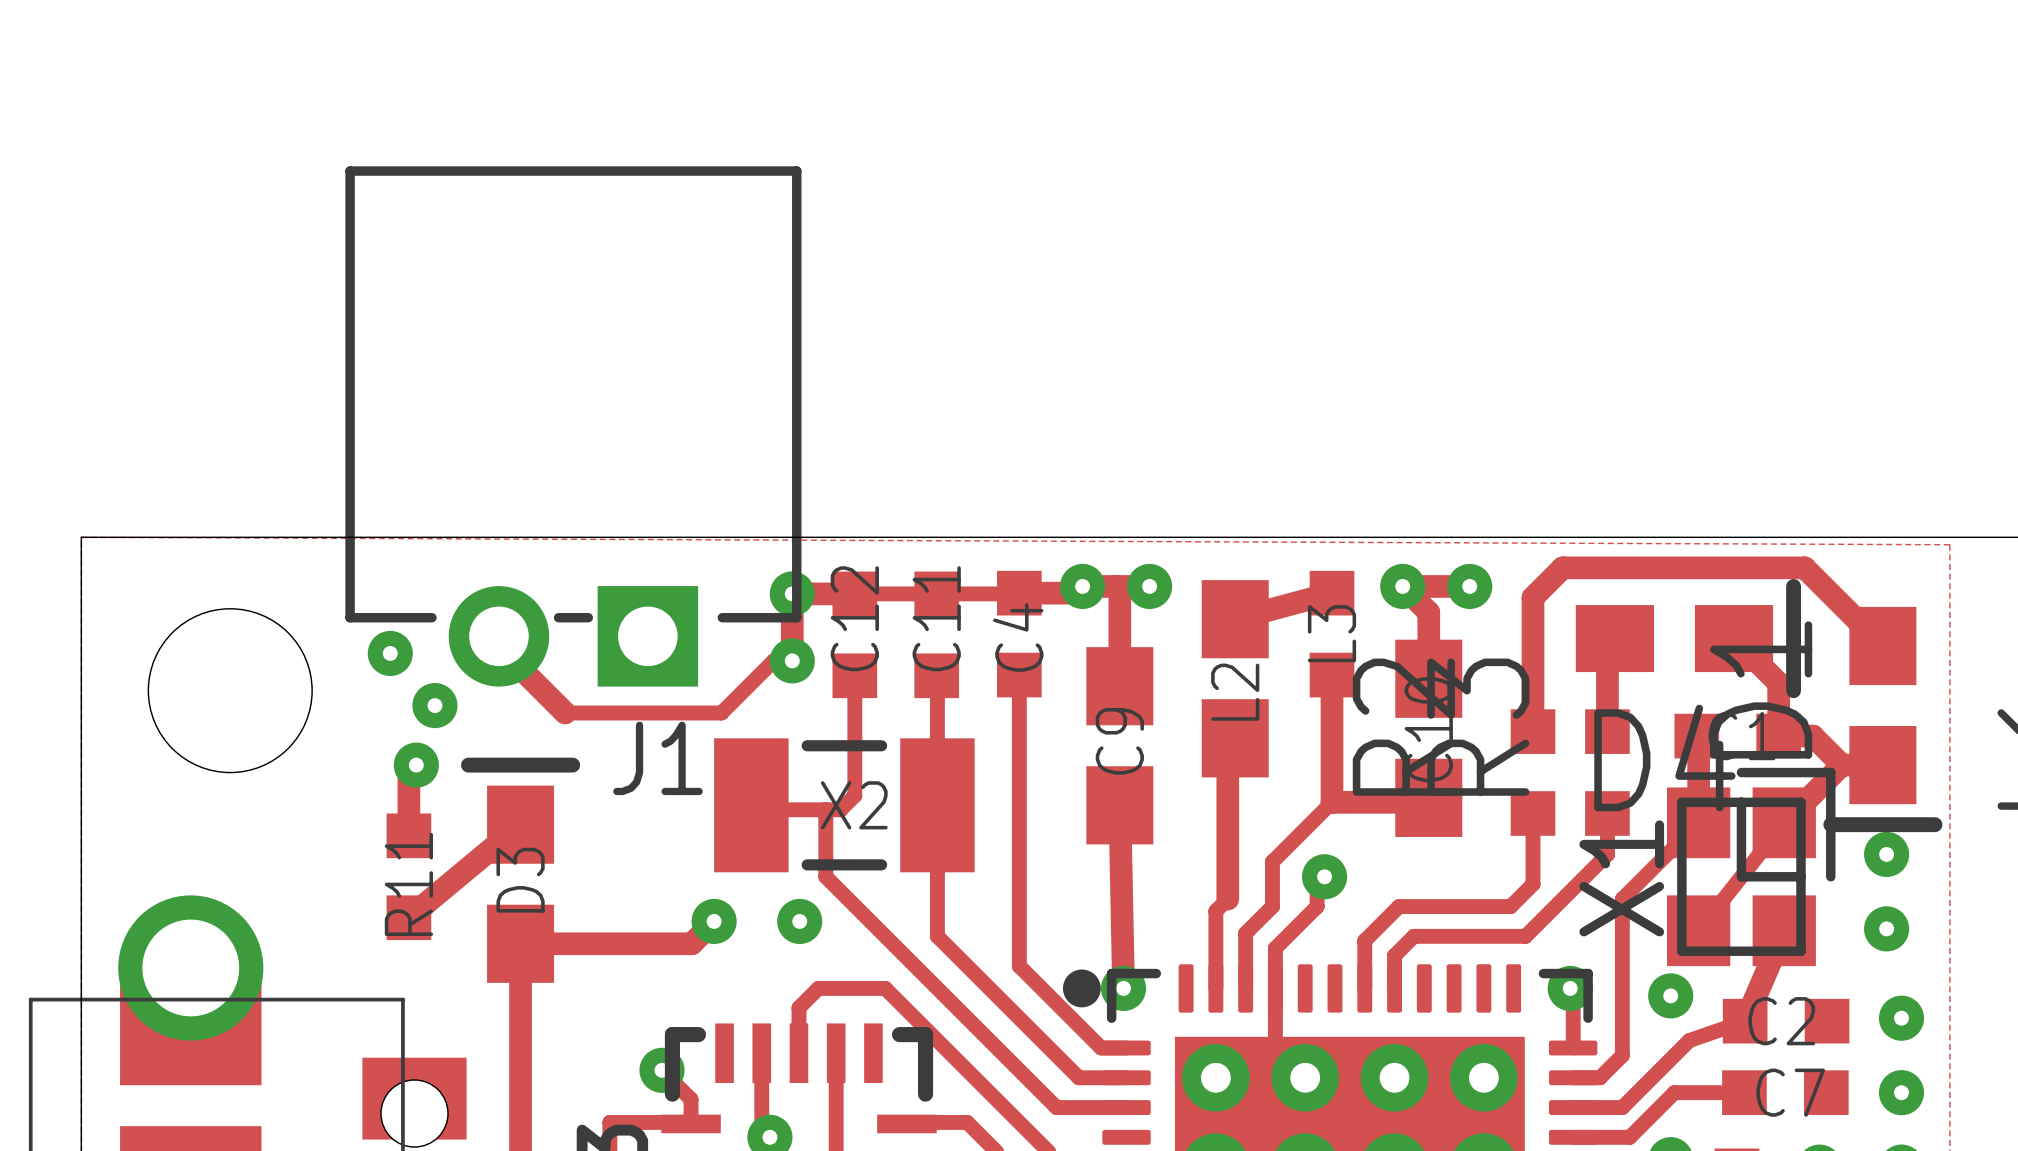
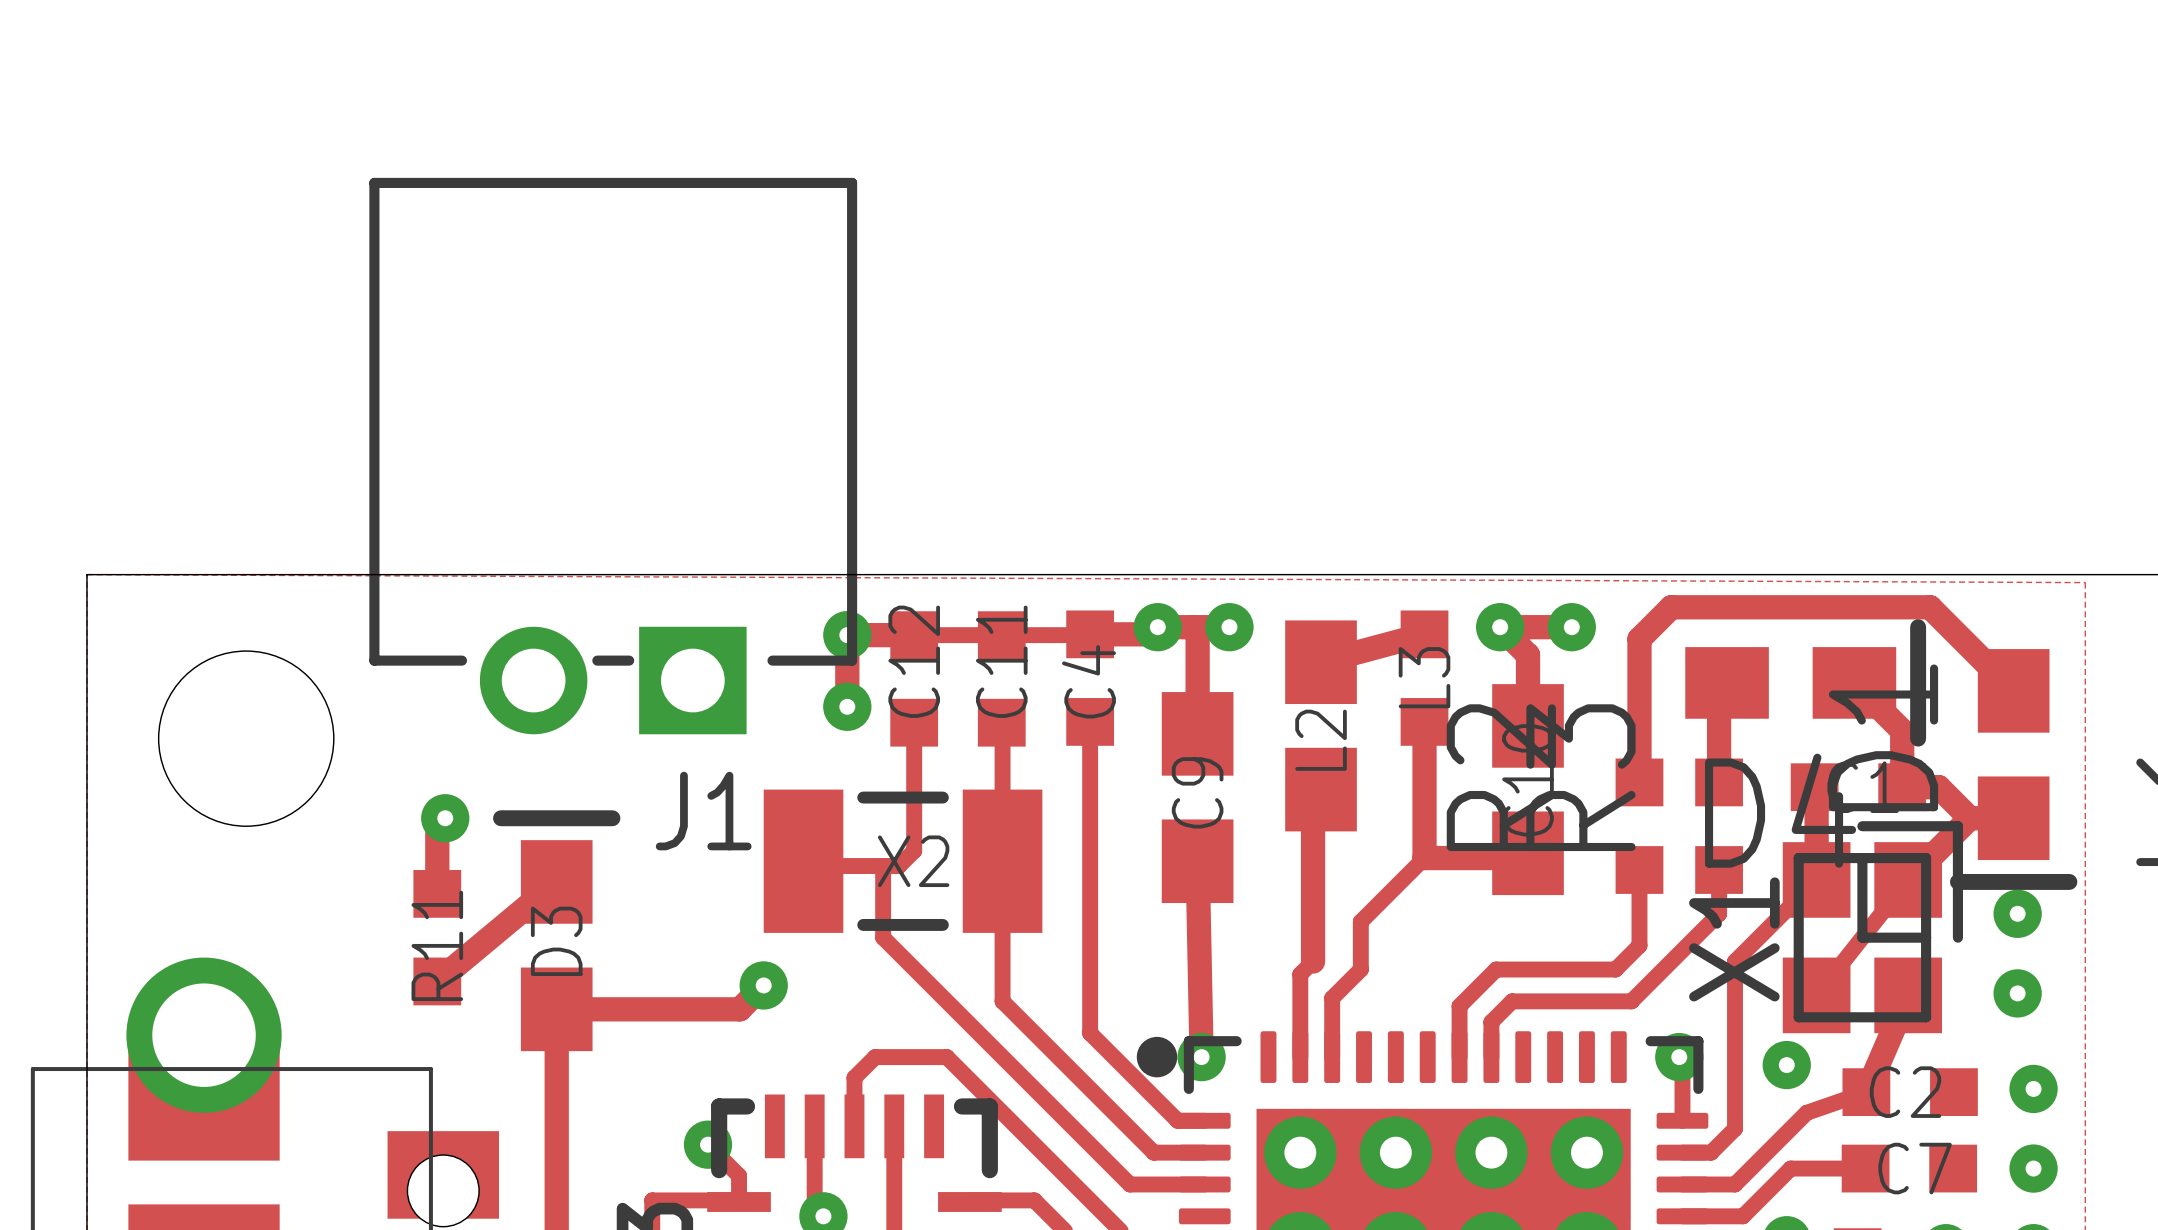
track: (498, 636) (498, 646) (565, 713) (721, 713) (773, 660) (792, 660) -> none
via: (390, 653) -> none
via: (434, 705) -> none
track: (1324, 876) (1317, 876) (1317, 906) (1275, 948) (1275, 1045) (1265, 1055) (1282, 1055) (1305, 1077) -> none
via: (1324, 876) -> none
via: (799, 921) -> none

